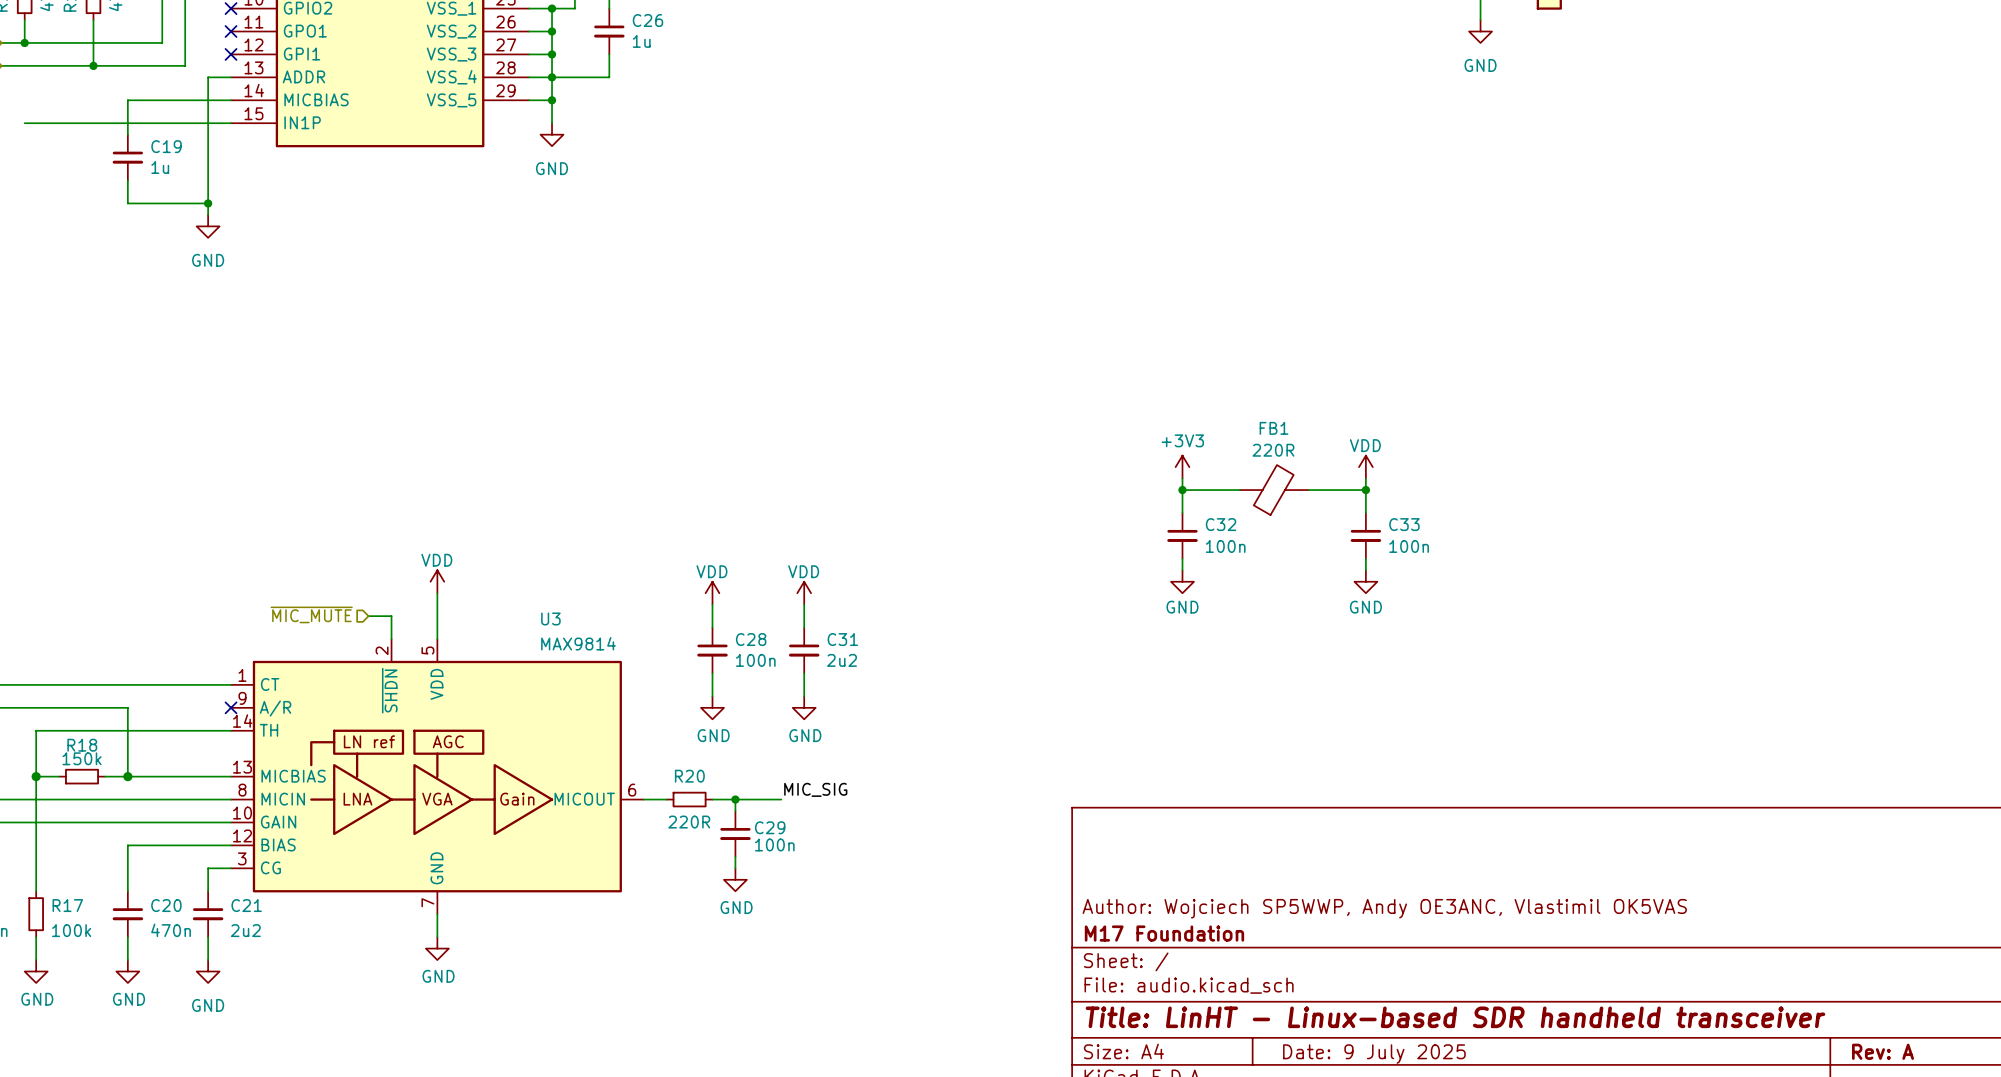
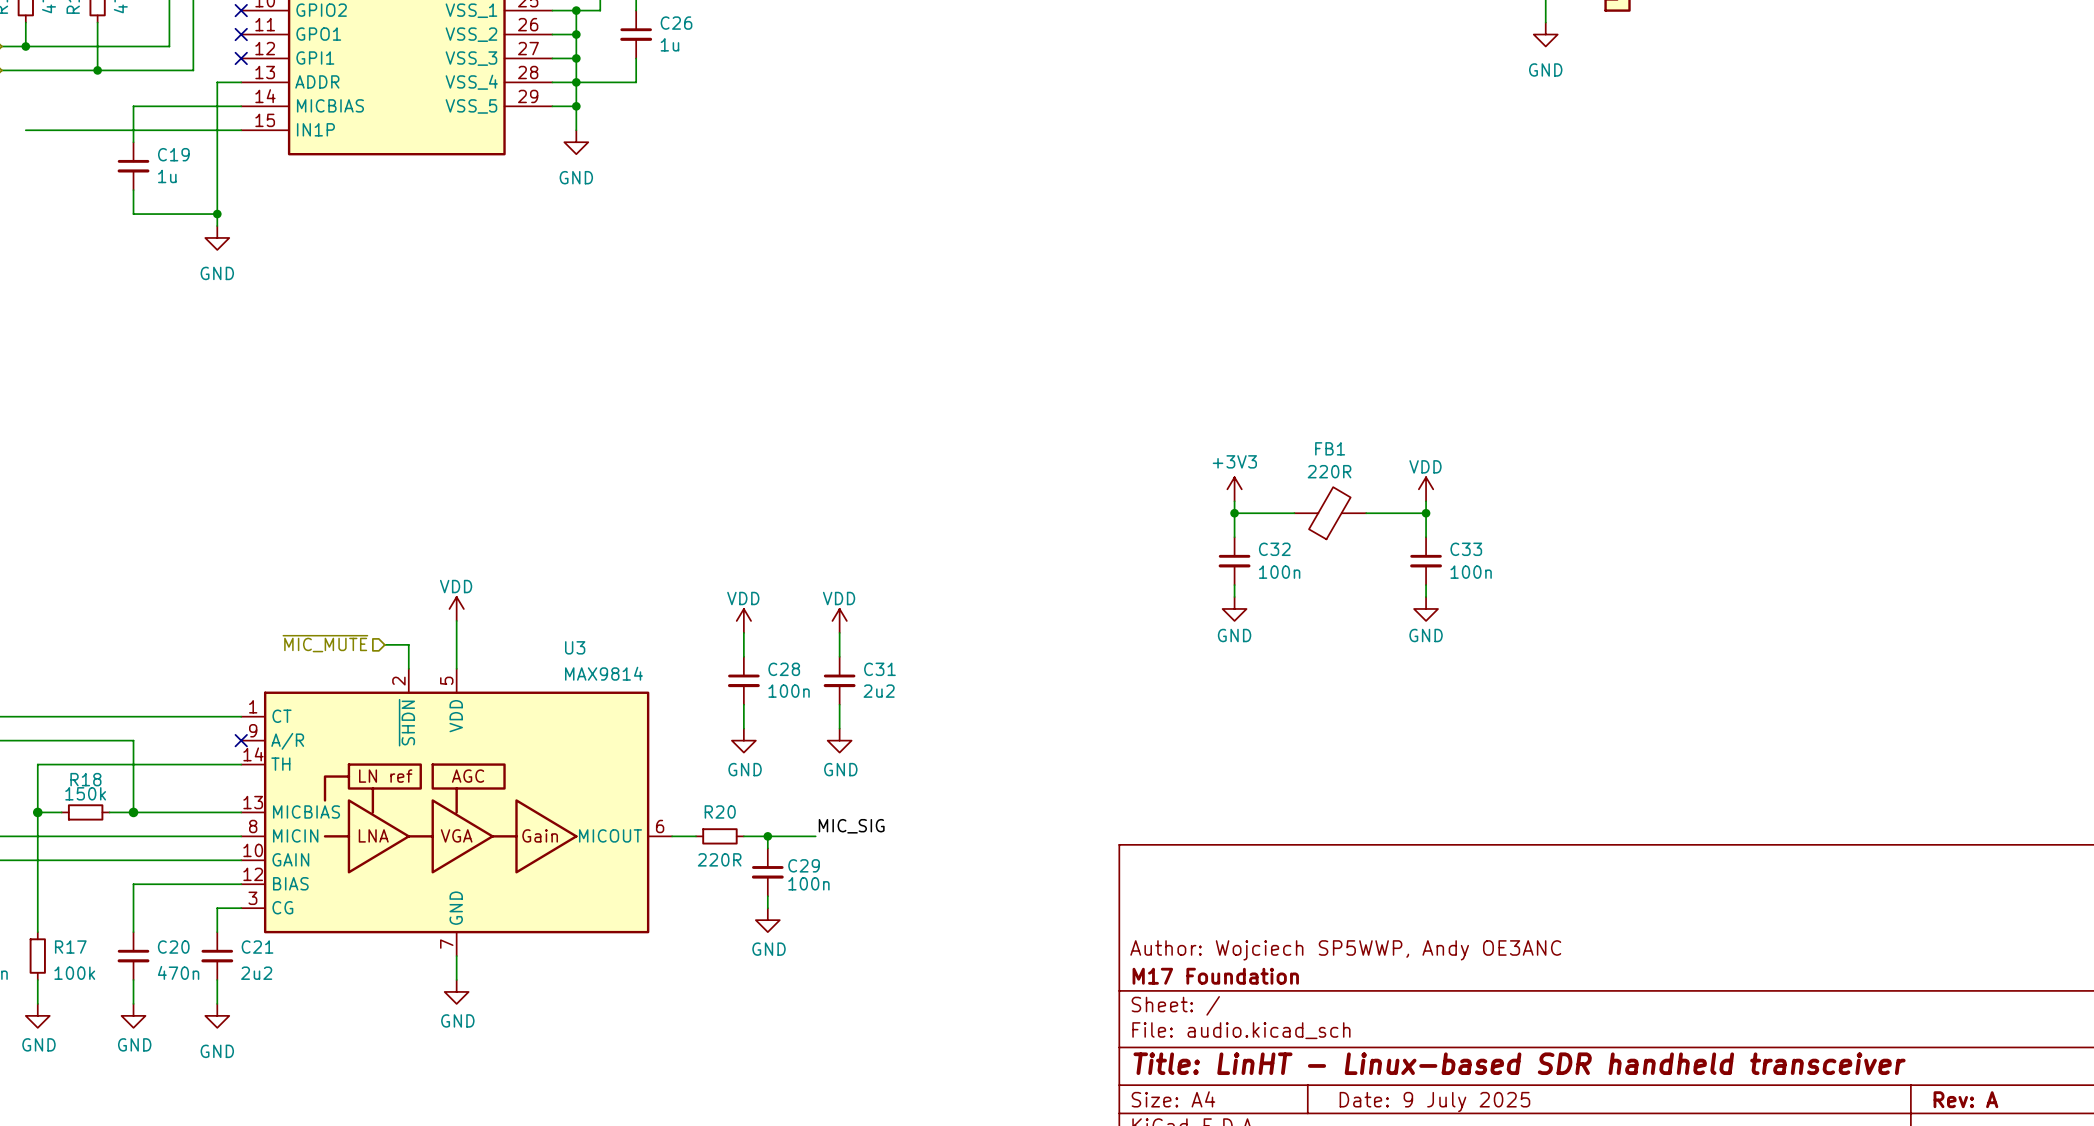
title block: Author: Wojciech SP5WWP, Andy OE3ANC, Vlastimil OK5VAS (1384, 908) -> Author: Wojciech SP5WWP, Andy OE3ANC (1345, 950)

